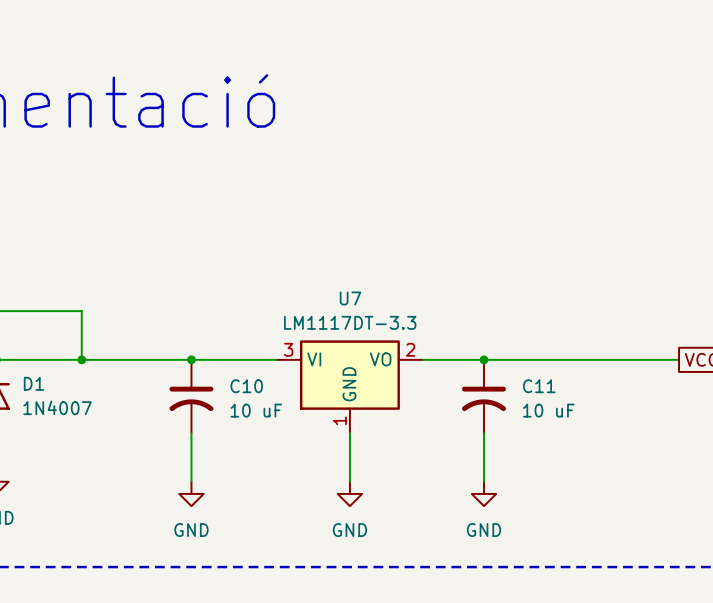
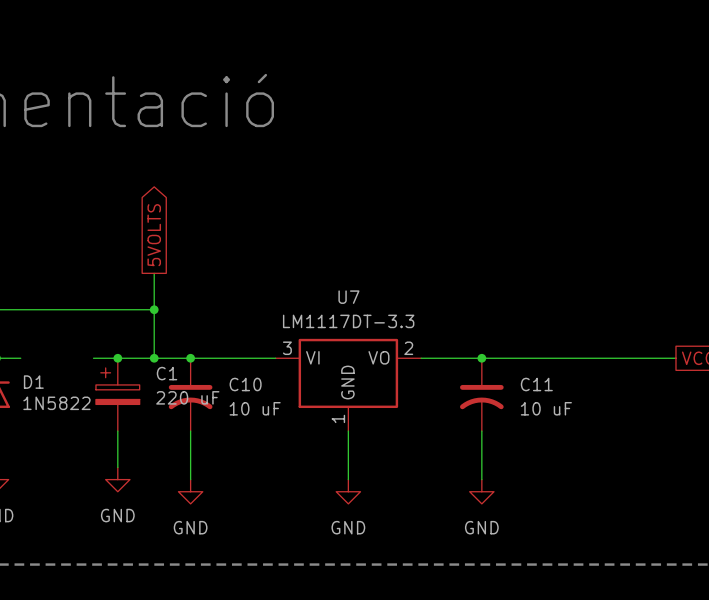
global label: none -> 5VOLTS (154, 235)
wire: none -> (154, 273) (154, 358)
wire: (81, 311) (81, 359) -> (81, 309) (154, 309)
junction: none -> (154, 309)
wire: (20, 359) (93, 359) -> none
junction: (81, 359) -> none
junction: none -> (117, 358)
junction: none -> (154, 358)
C1: none -> 220 uF (117, 394)
D1 value: 1N4007 (57, 407) -> 1N5822 (56, 403)
wire: none -> (117, 431) (117, 467)
power symbol: none -> GND (117, 479)

